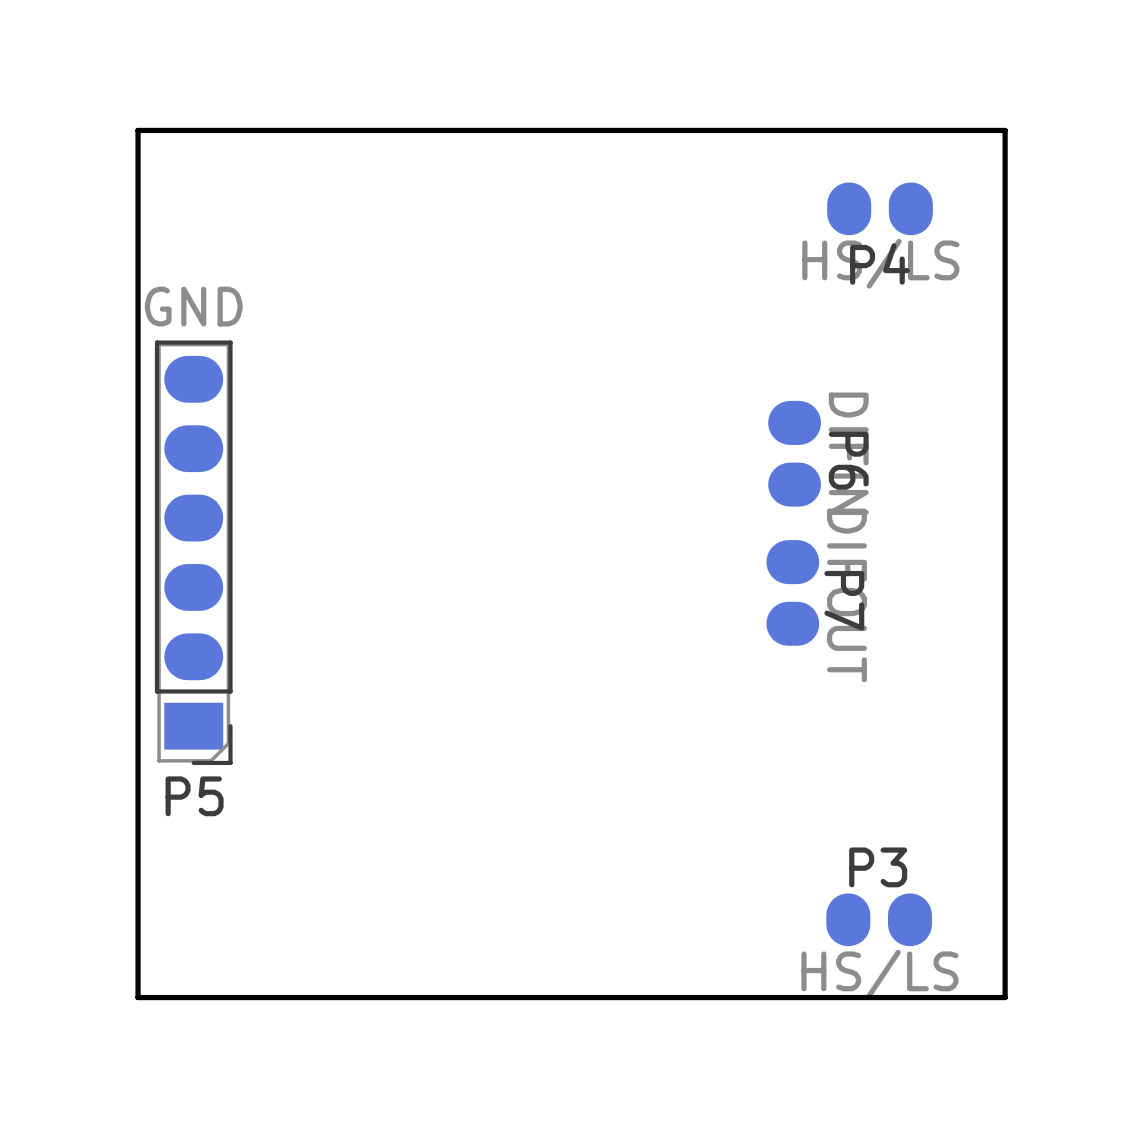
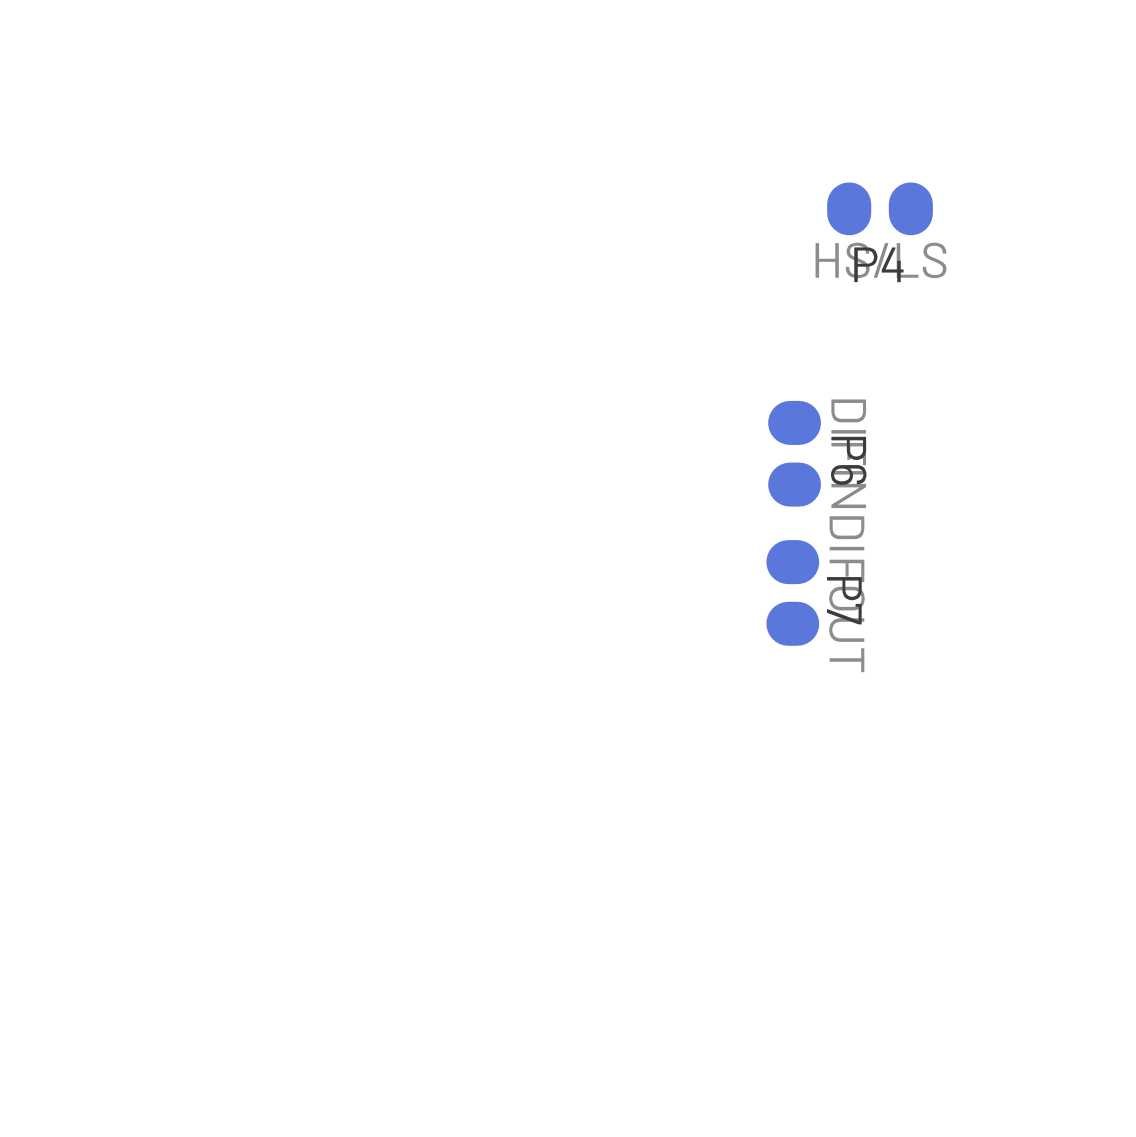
board edge: (1005, 130) (1005, 997) (138, 997) (138, 130) (1005, 130) -> none
P5: GND (193, 552) -> none
P3: HS/LS (879, 919) -> none

